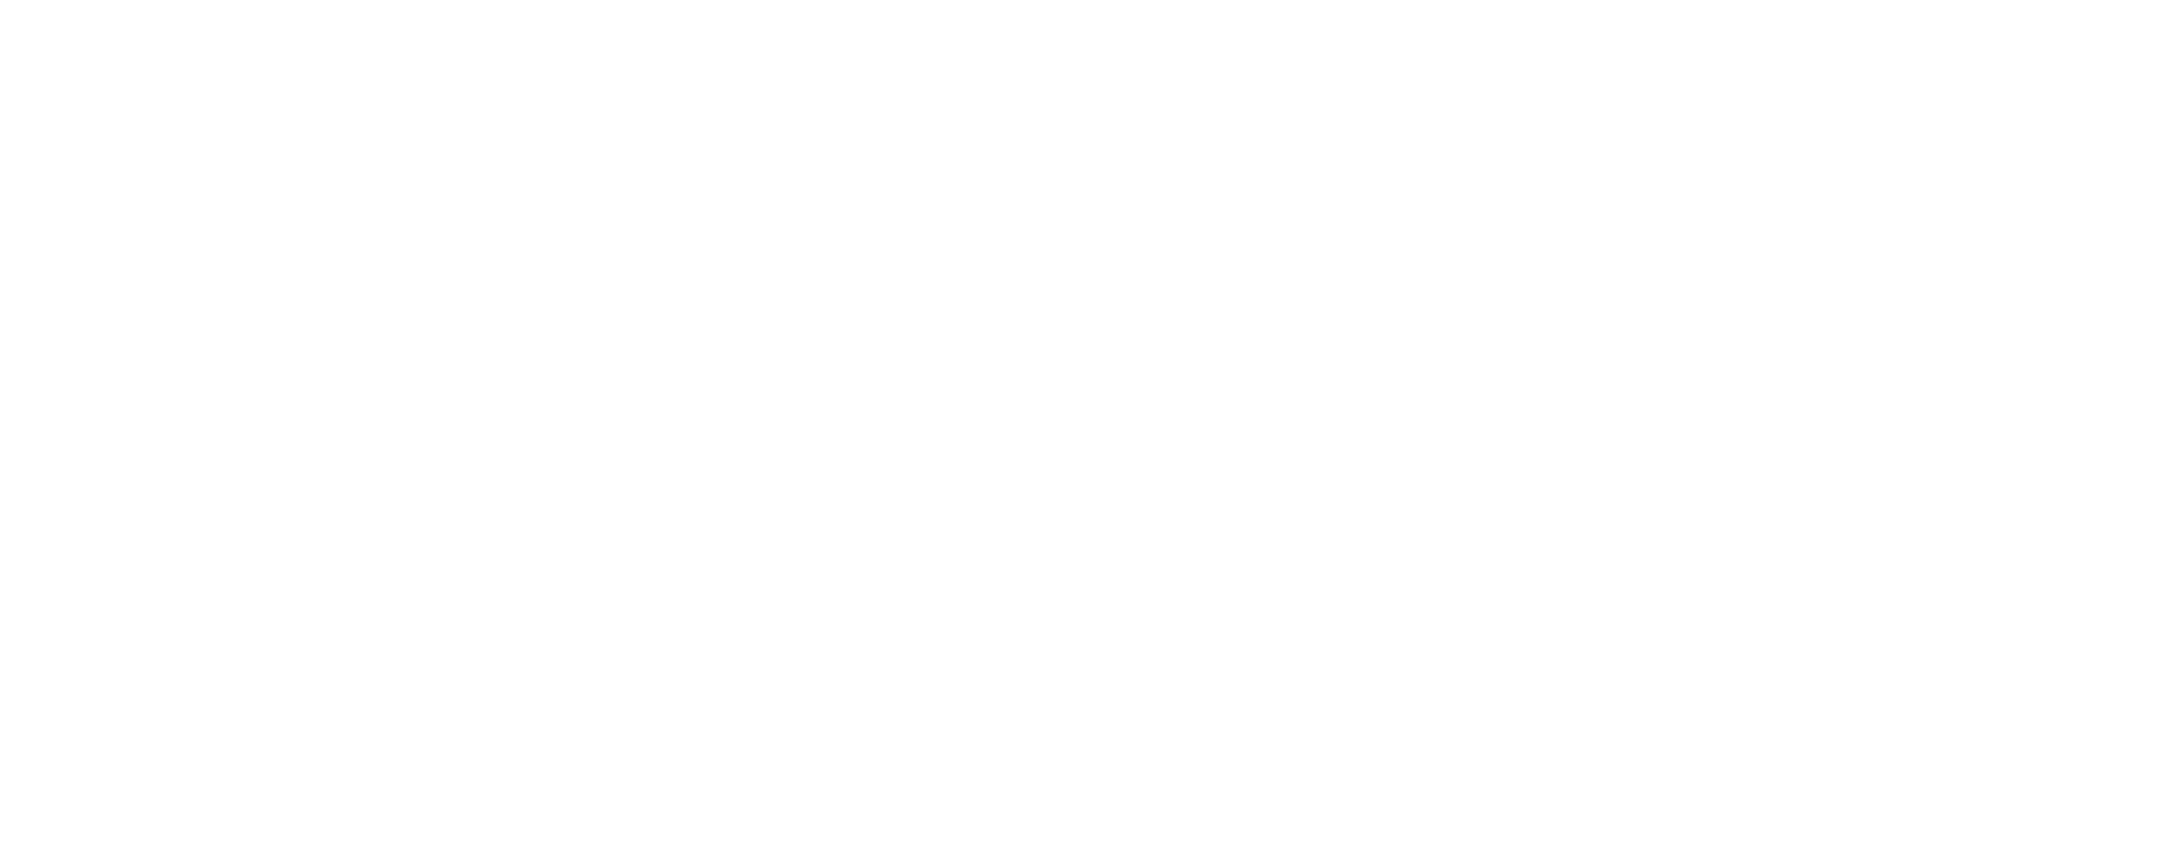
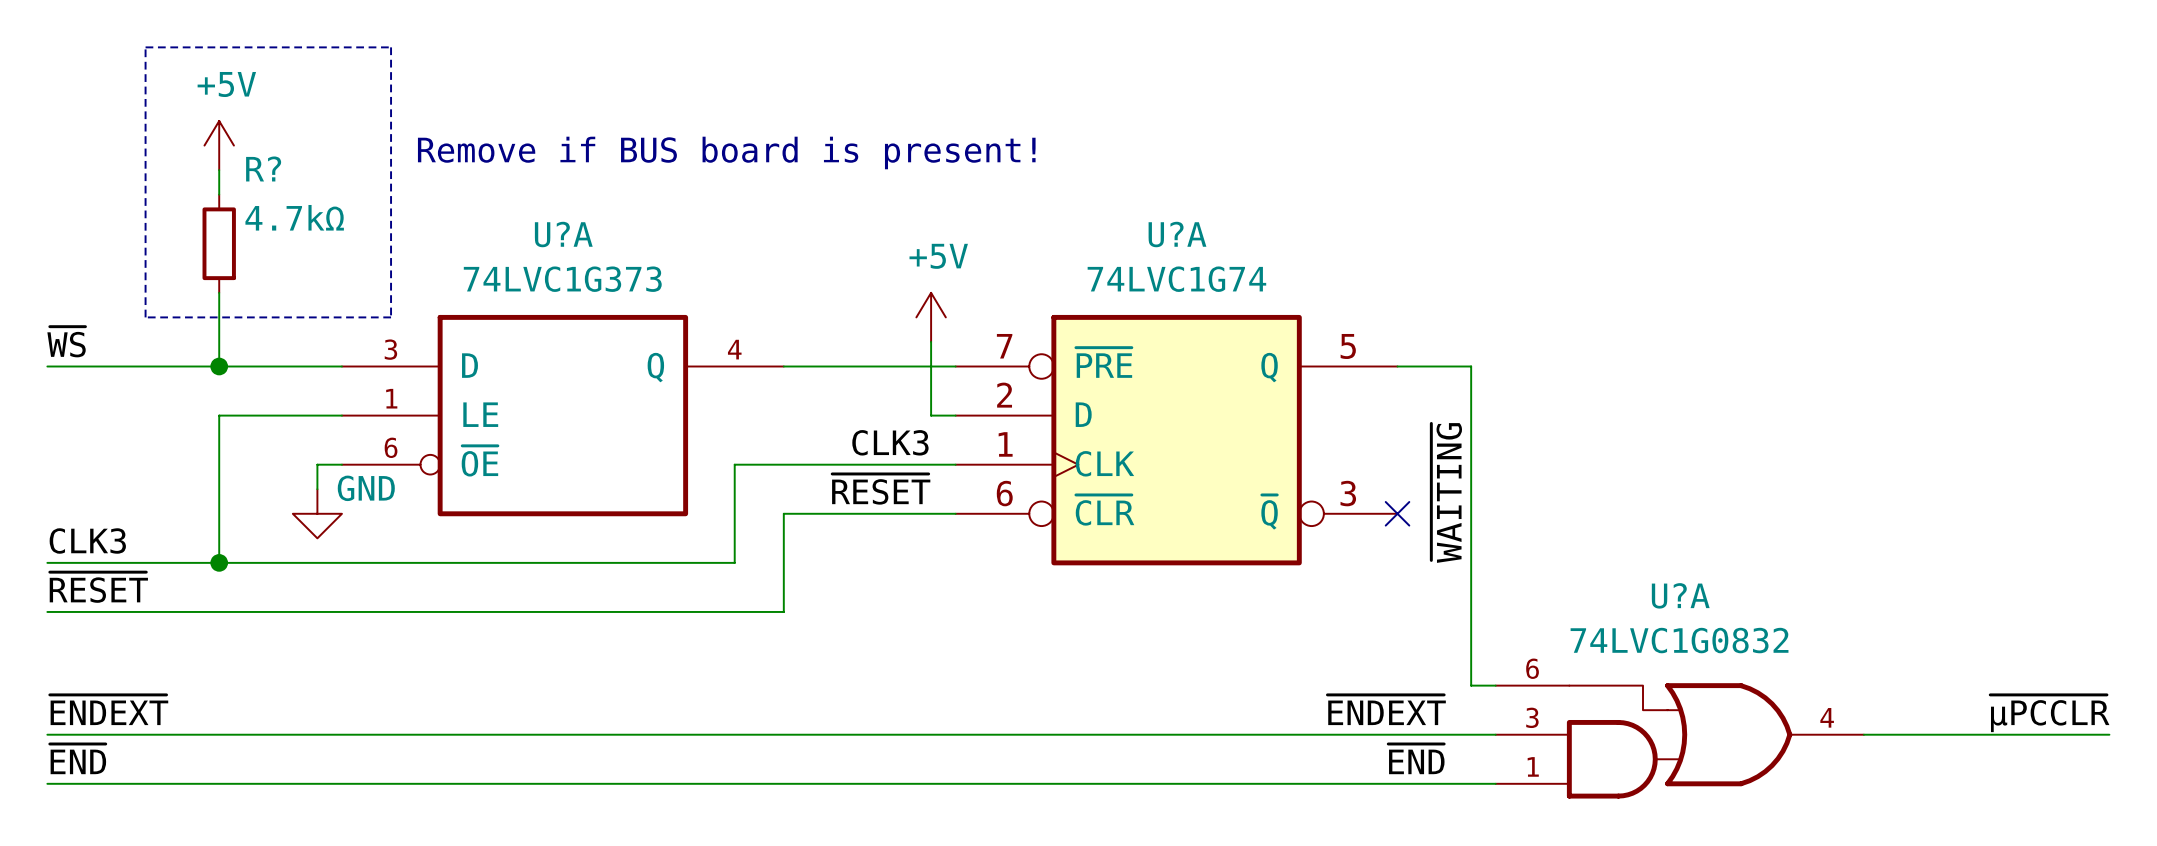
line: none -> (145, 47) (391, 47) (391, 317) (145, 317) (145, 47)
power symbol: none -> +5V (219, 145)
text: none -> Remove if BUS board is present! (726, 152)
wire: none -> (219, 170) (219, 194)
R?: none -> 4.7kΩ (219, 243)
wire: none -> (219, 292) (219, 366)
power symbol: none -> +5V (931, 317)
label: none -> ~{WS} (66, 342)
wire: none -> (931, 341) (931, 415) (955, 415)
wire: none -> (47, 366) (341, 366)
junction: none -> (219, 366)
wire: none -> (783, 366) (955, 366)
wire: none -> (1397, 366) (1471, 366) (1471, 685) (1495, 685)
wire: none -> (341, 415) (219, 415) (219, 562)
U?A: none -> 74LVC1G373 (562, 415)
U?A: none -> 74LVC1G74 (1176, 440)
label: none -> CLK3 (890, 442)
wire: none -> (341, 464) (317, 464) (317, 489)
wire: none -> (955, 464) (734, 464) (734, 562) (47, 562)
label: none -> ~{RESET} (881, 489)
label: none -> ~{WAITING} (1446, 492)
power symbol: none -> GND (317, 513)
wire: none -> (955, 513) (783, 513) (783, 611) (47, 611)
no-connect mark: none -> (1397, 513)
label: none -> CLK3 (87, 540)
junction: none -> (219, 562)
label: none -> ~{RESET} (98, 587)
label: none -> ~{ENDEXT} (109, 709)
label: none -> ~{ENDEXT} (1386, 709)
label: none -> ~{µPCCLR} (2049, 713)
wire: none -> (47, 734) (1495, 734)
wire: none -> (1863, 734) (2109, 734)
U?A: none -> 74LVC1G0832 (1679, 740)
label: none -> ~{END} (77, 759)
label: none -> ~{END} (1416, 759)
wire: none -> (47, 783) (1495, 783)

